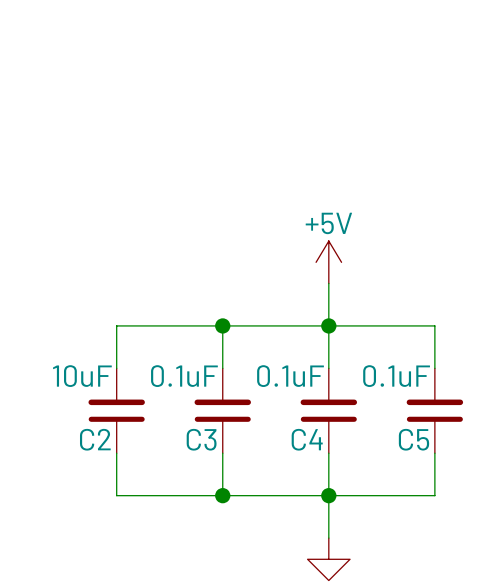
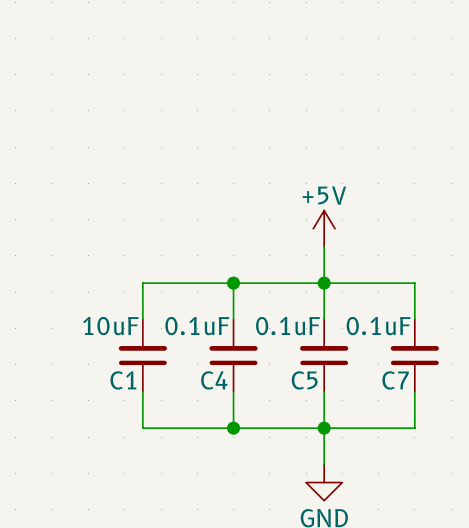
C2 name: C2 (95, 439) -> C1 (123, 380)
C3 name: C3 (201, 439) -> C4 (214, 380)
C4 name: C4 (307, 439) -> C5 (304, 380)
C5 name: C5 (413, 439) -> C7 (395, 380)

